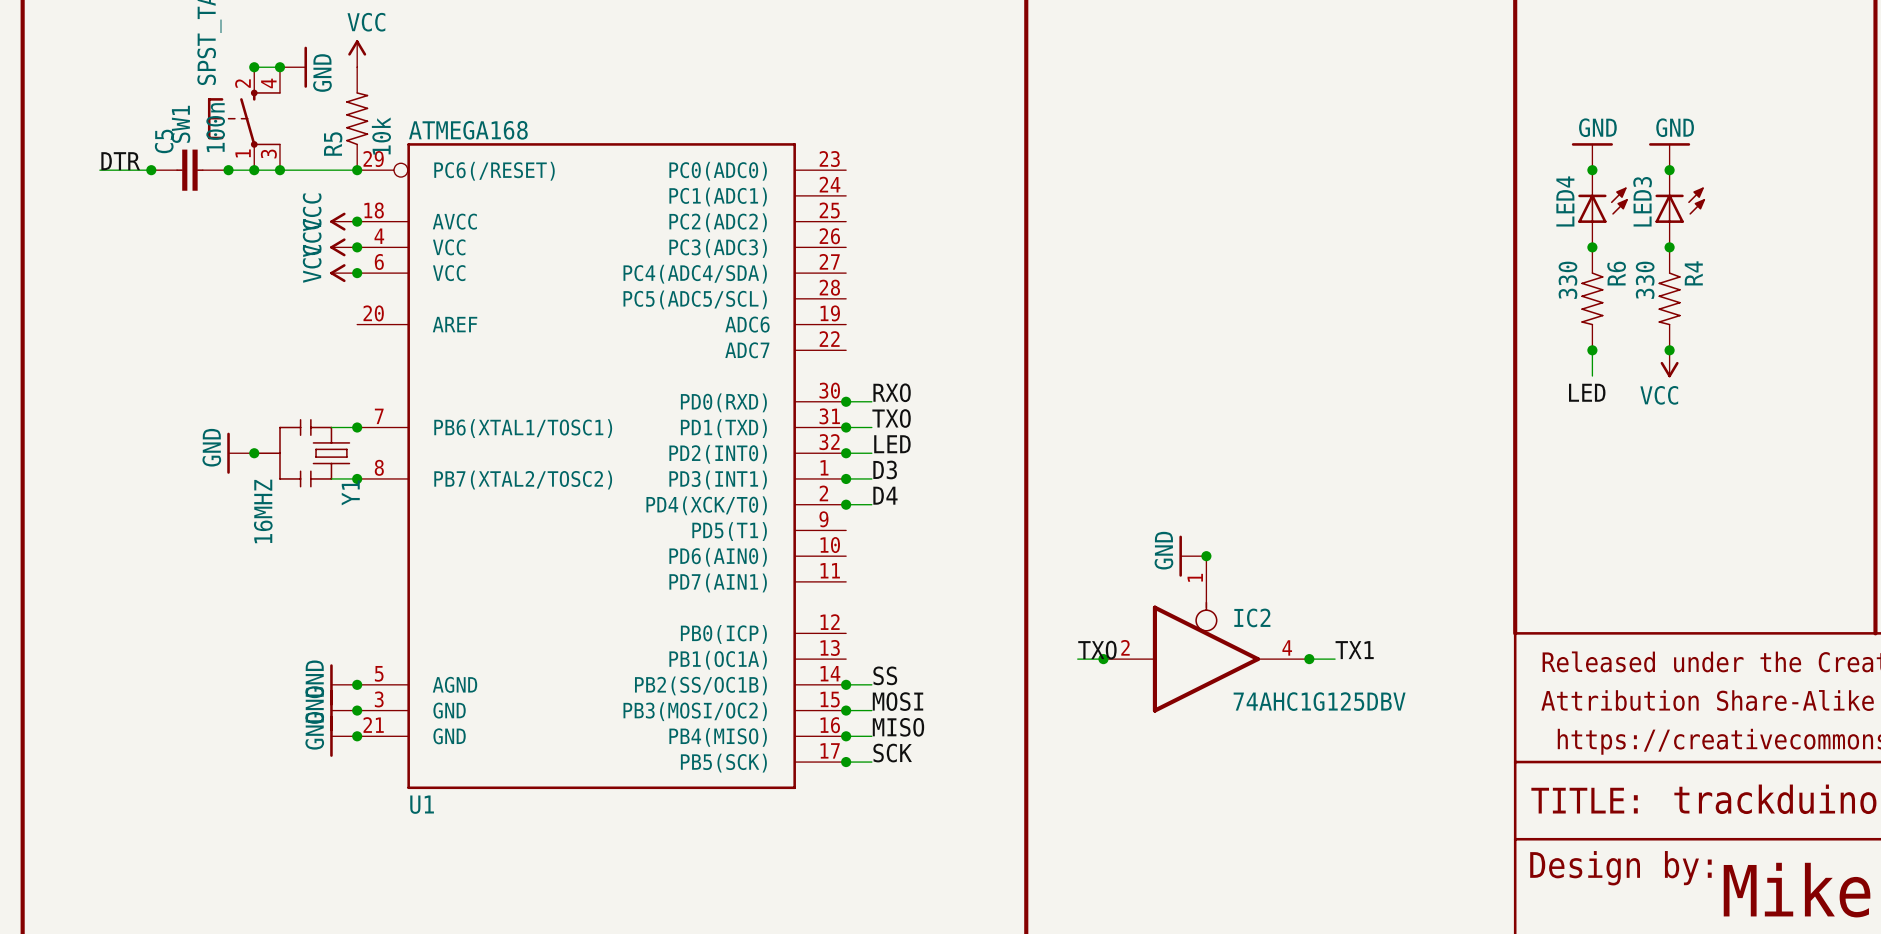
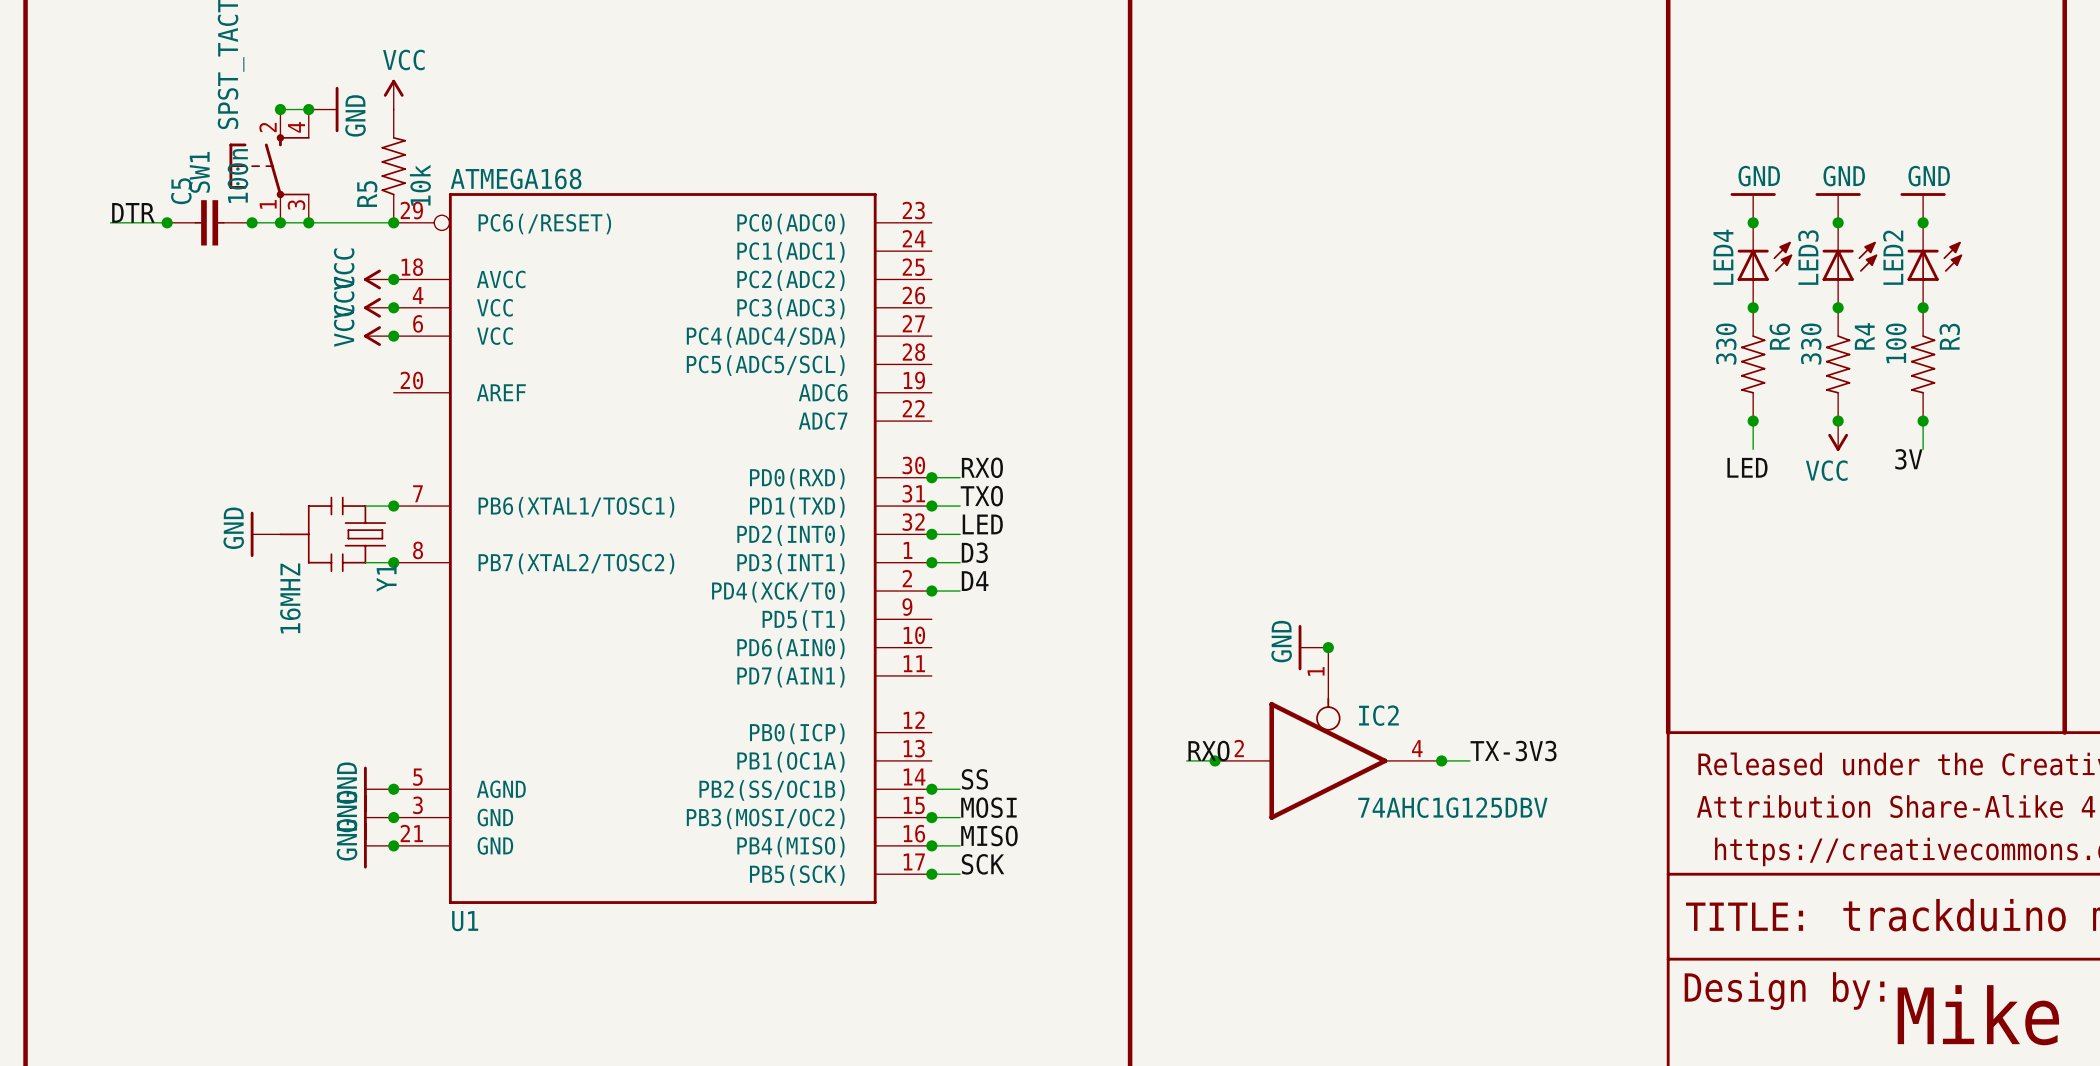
power symbol: none -> GND (1923, 207)
junction: none -> (1923, 222)
LED2: none -> (1934, 265)
junction: none -> (1923, 307)
R3: none -> 100 (1923, 364)
wire: none -> (1923, 421) (1923, 449)
junction: none -> (1923, 421)
label: none -> 3V (1908, 459)
junction: (254, 453) -> none
label: TXO (1097, 650) -> RXO (1208, 751)
label: TX1 (1354, 650) -> TX-3V3 (1513, 751)

